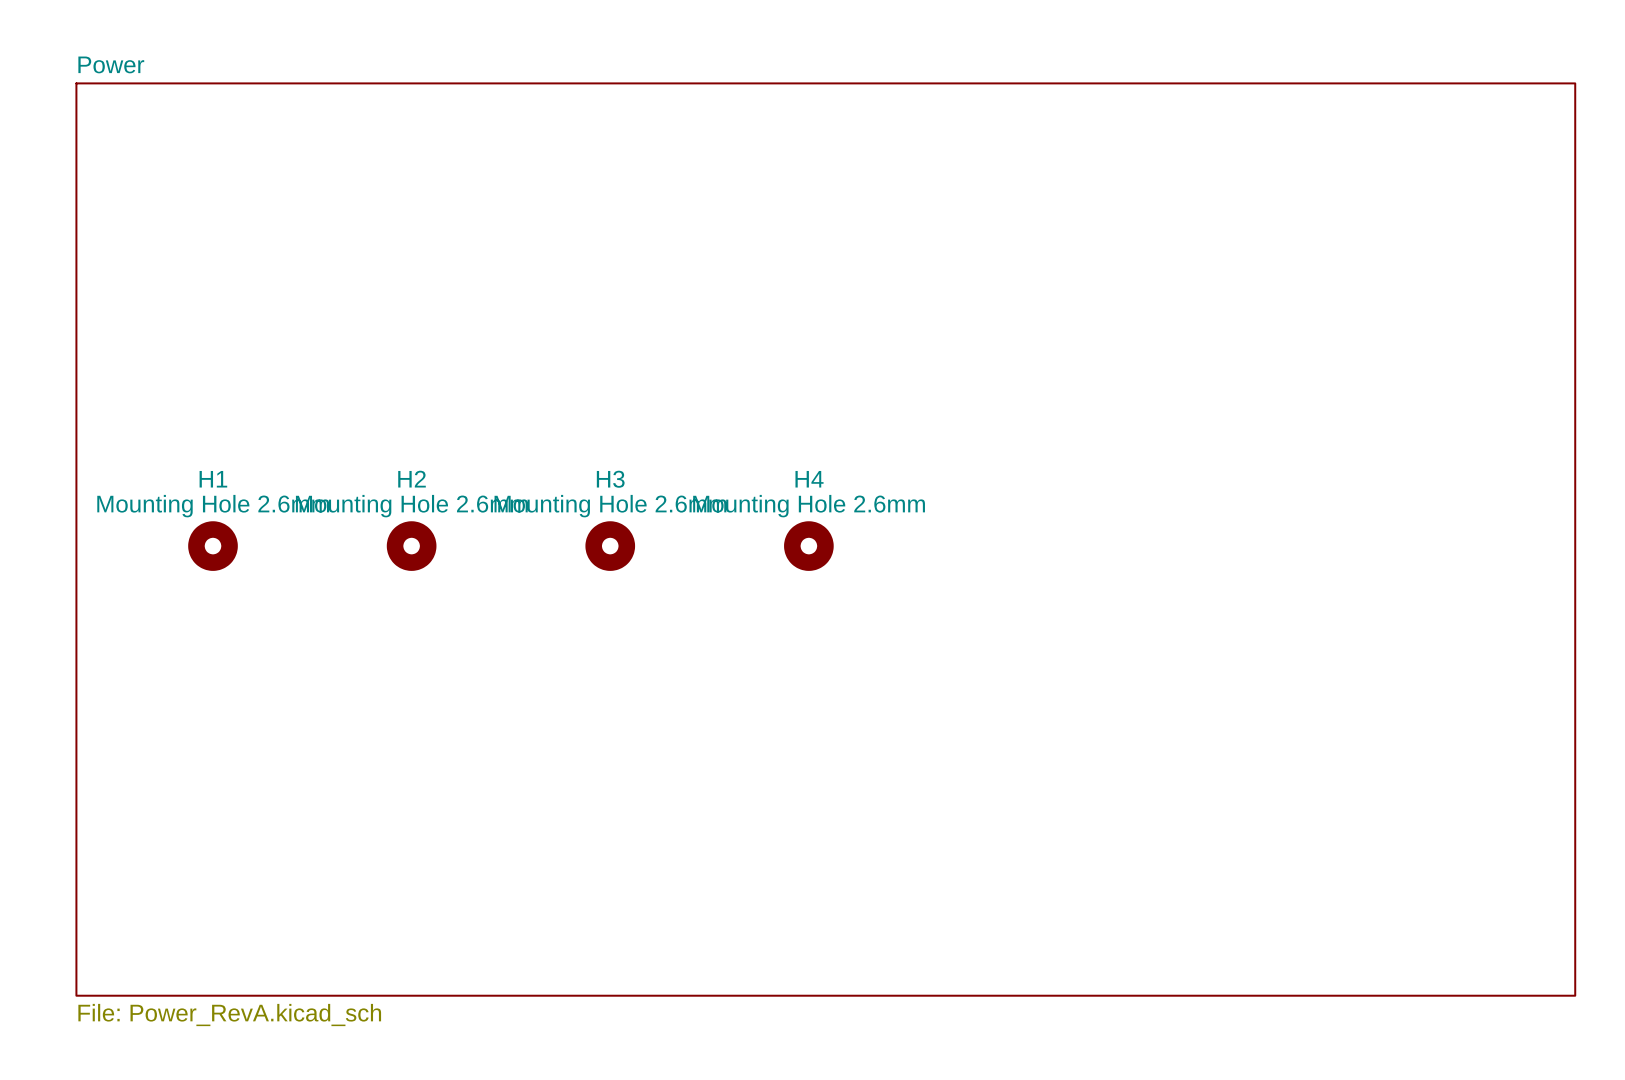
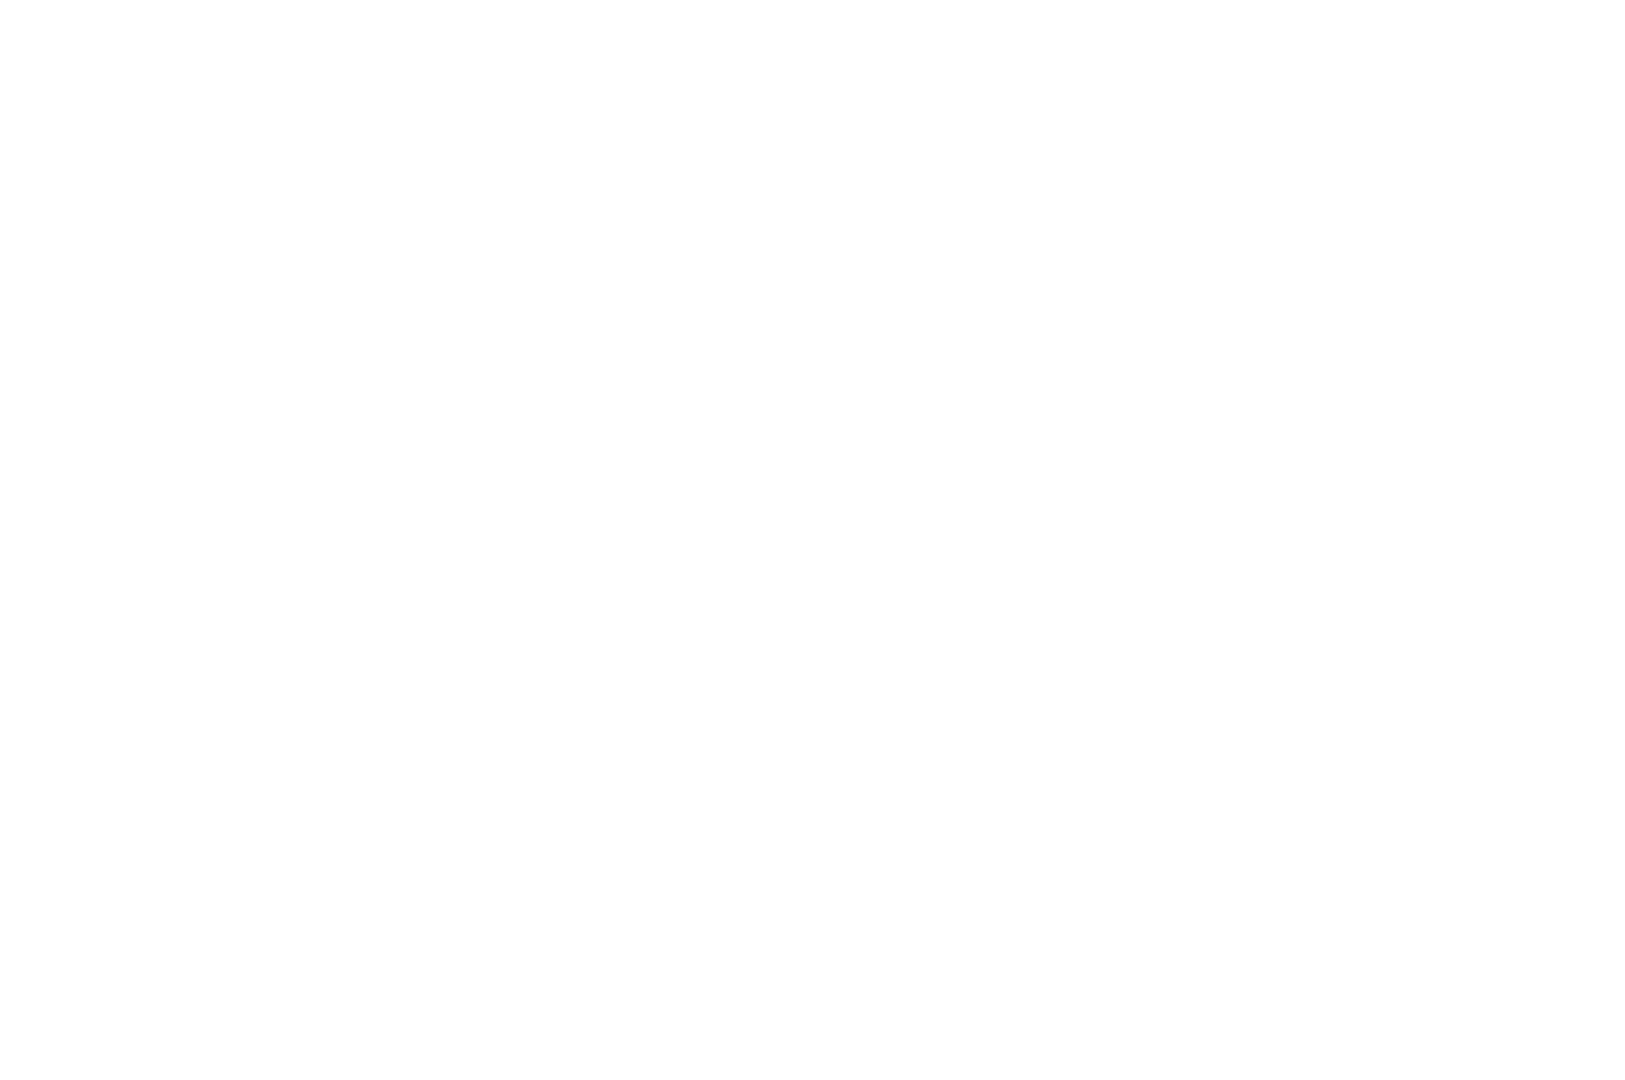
sheet Power: File: Power_RevA.kicad_sch (825, 539) -> none
H1: Mounting Hole 2.6mm (213, 546) -> none
H2: Mounting Hole 2.6mm (411, 546) -> none
H3: Mounting Hole 2.6mm (610, 546) -> none
H4: Mounting Hole 2.6mm (808, 546) -> none

